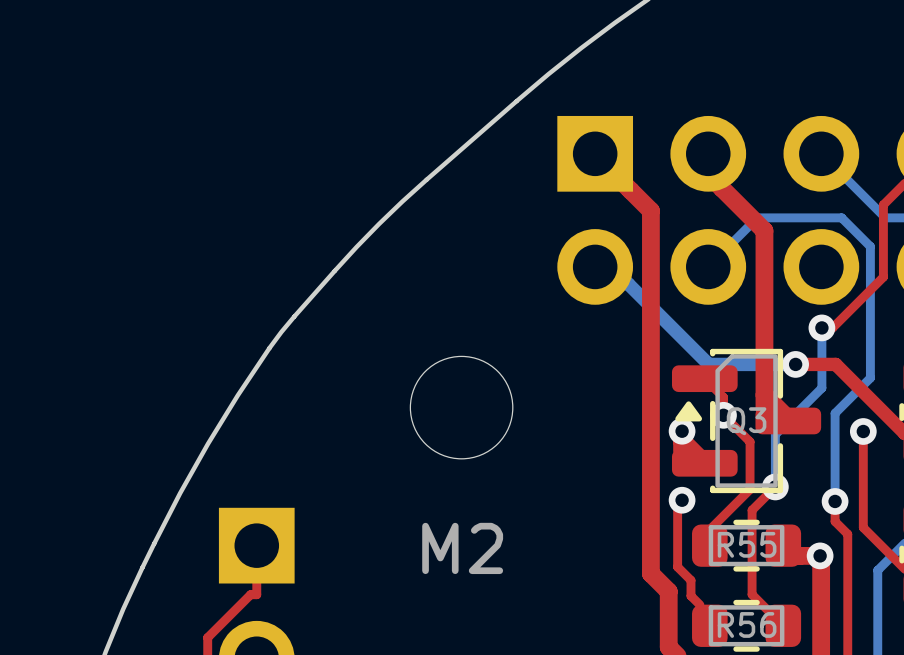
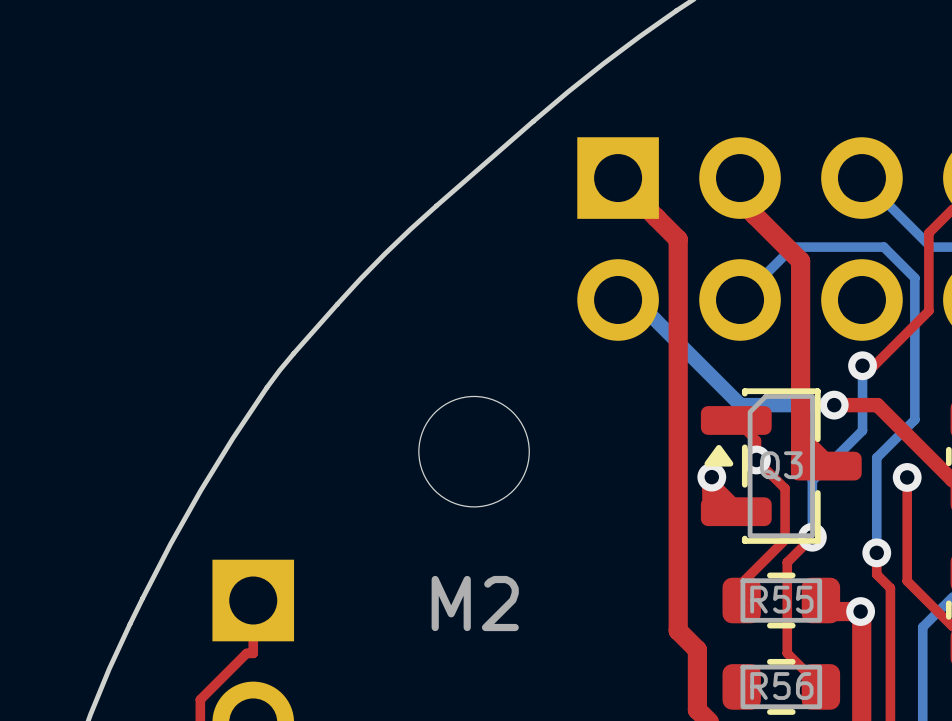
top track: (682, 500) (677, 504) (677, 567) (690, 580) (690, 595) (699, 604) -> none
via: (682, 500) -> none

